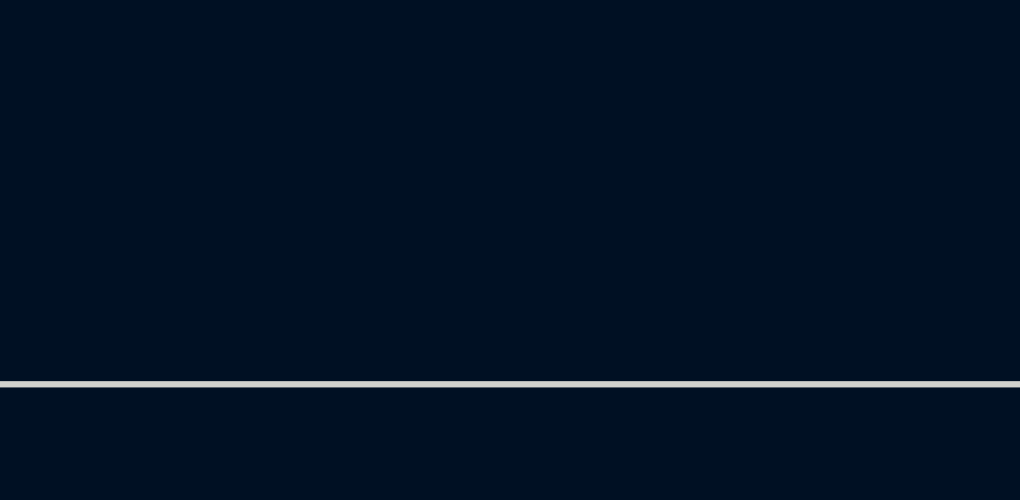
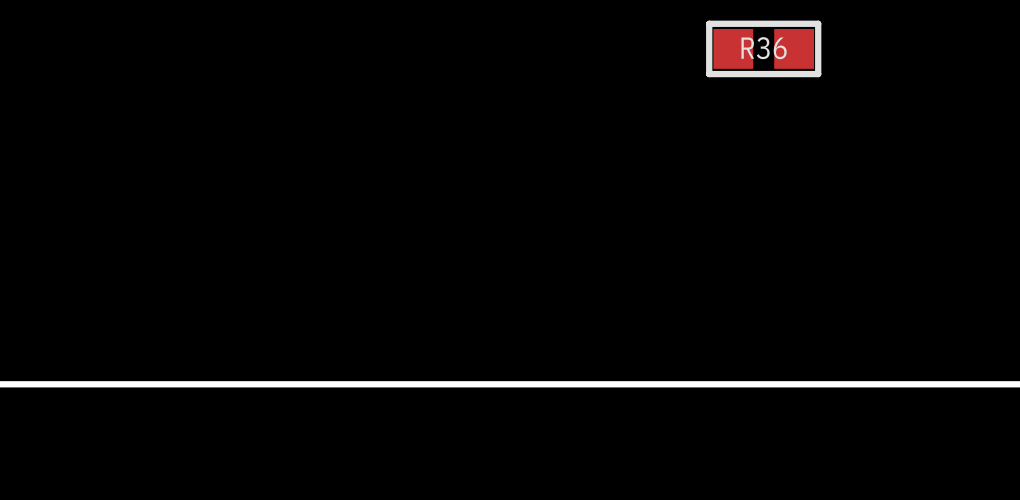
R36: none -> (763, 48)

